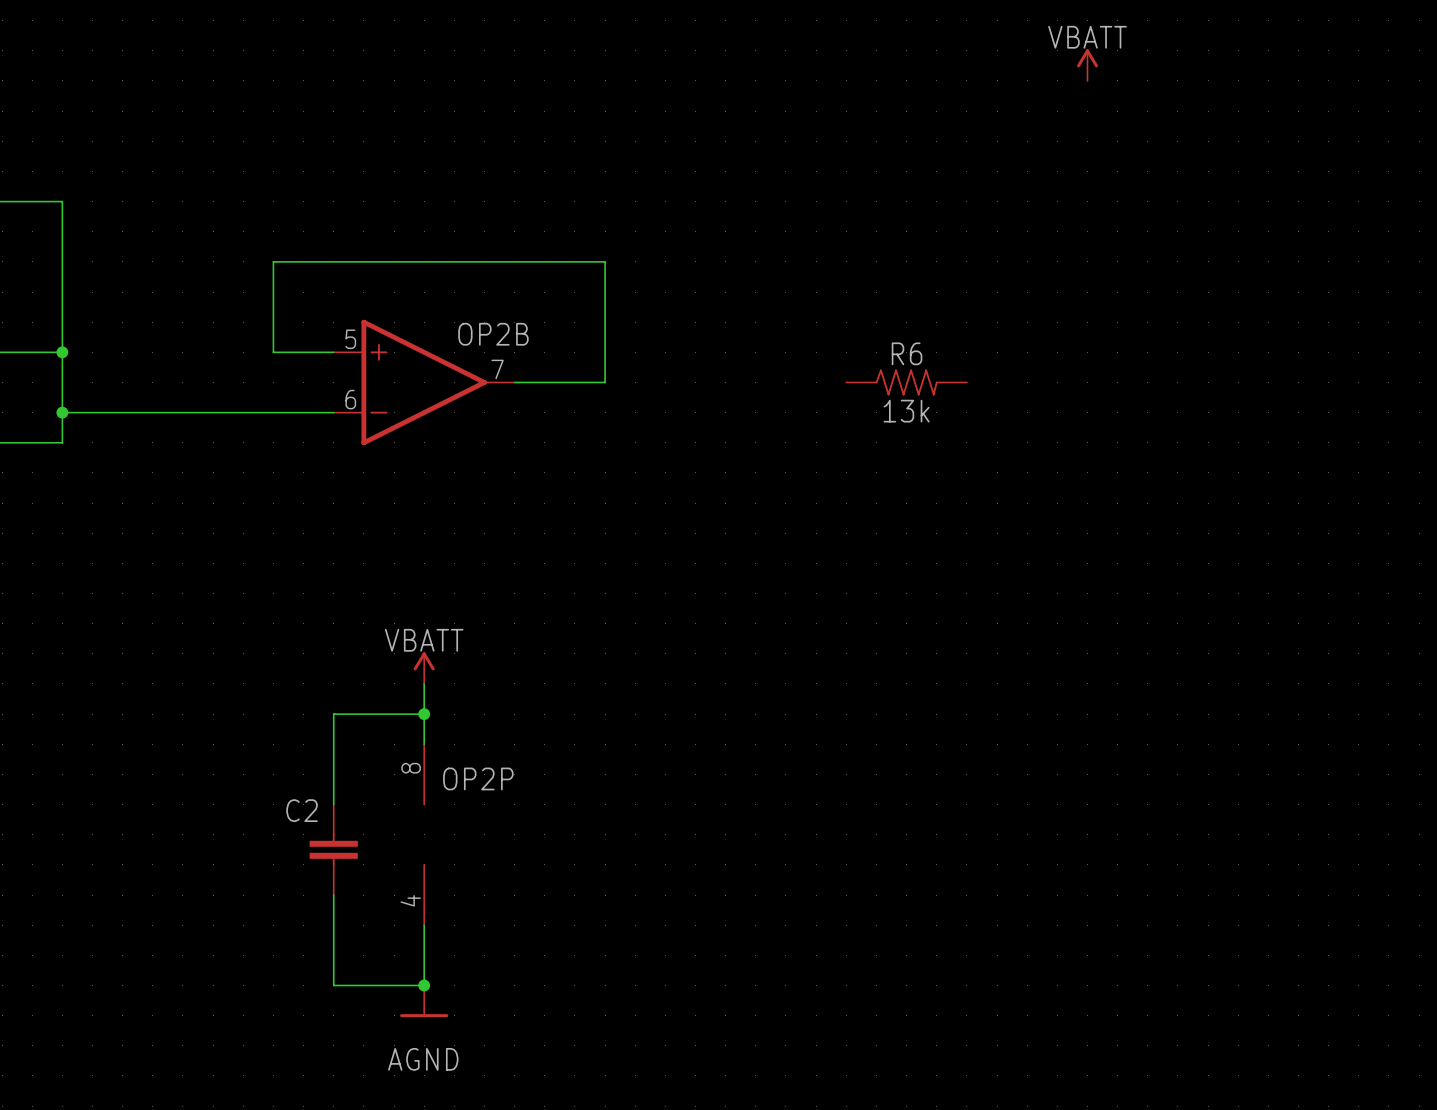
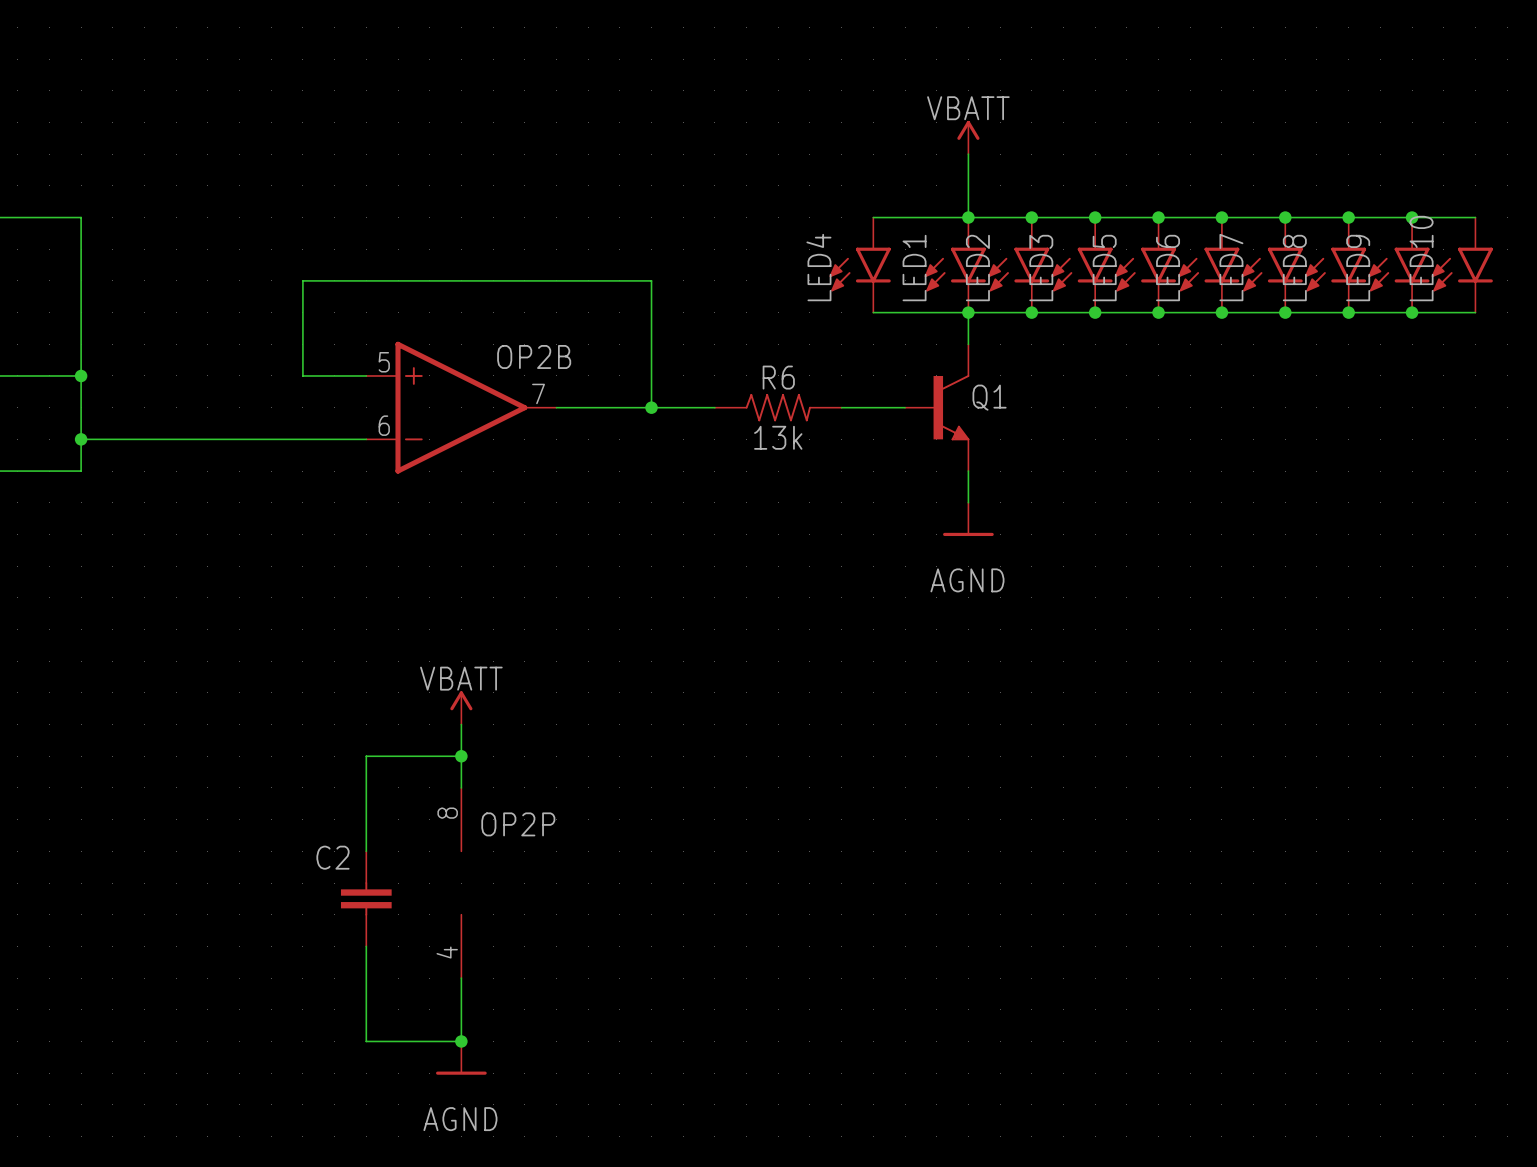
power symbol position: VBATT (1087, 65) -> VBATT (968, 137)
wire: none -> (968, 154) (968, 217)
wire: none -> (873, 217) (1475, 217)
junction: none -> (968, 217)
junction: none -> (1031, 217)
junction: none -> (1095, 217)
junction: none -> (1158, 217)
junction: none -> (1221, 217)
junction: none -> (1285, 217)
junction: none -> (1348, 217)
junction: none -> (1412, 217)
LED4: none -> (860, 265)
LED1: none -> (955, 265)
LED2: none -> (1018, 265)
LED3: none -> (1082, 265)
LED5: none -> (1145, 265)
LED6: none -> (1208, 265)
LED7: none -> (1272, 265)
LED8: none -> (1335, 265)
LED9: none -> (1398, 265)
LED10: none -> (1462, 265)
wire: none -> (873, 312) (1475, 312)
wire: none -> (968, 312) (968, 344)
junction: none -> (968, 312)
junction: none -> (1031, 312)
junction: none -> (1095, 312)
junction: none -> (1158, 312)
junction: none -> (1221, 312)
junction: none -> (1285, 312)
junction: none -> (1348, 312)
junction: none -> (1412, 312)
wire: none -> (651, 407) (714, 407)
junction: none -> (651, 407)
wire: none -> (841, 407) (905, 407)
Q1: none -> (937, 407)
R6 position: (906, 382) -> (778, 407)
wire: none -> (968, 471) (968, 502)
power symbol: none -> AGND (968, 519)

